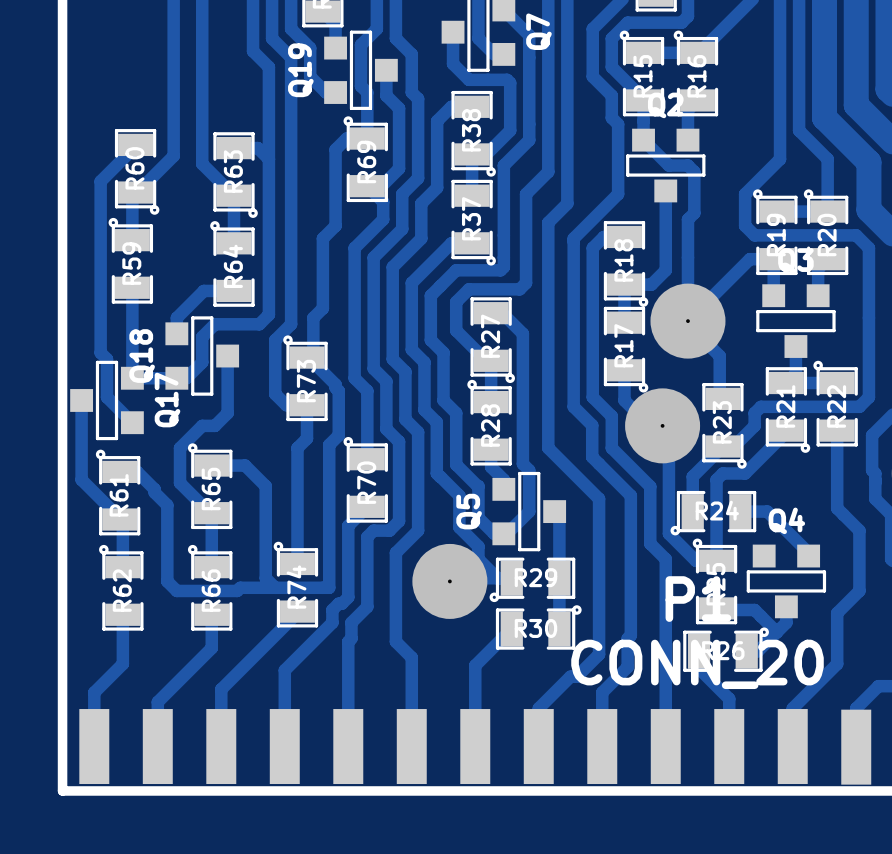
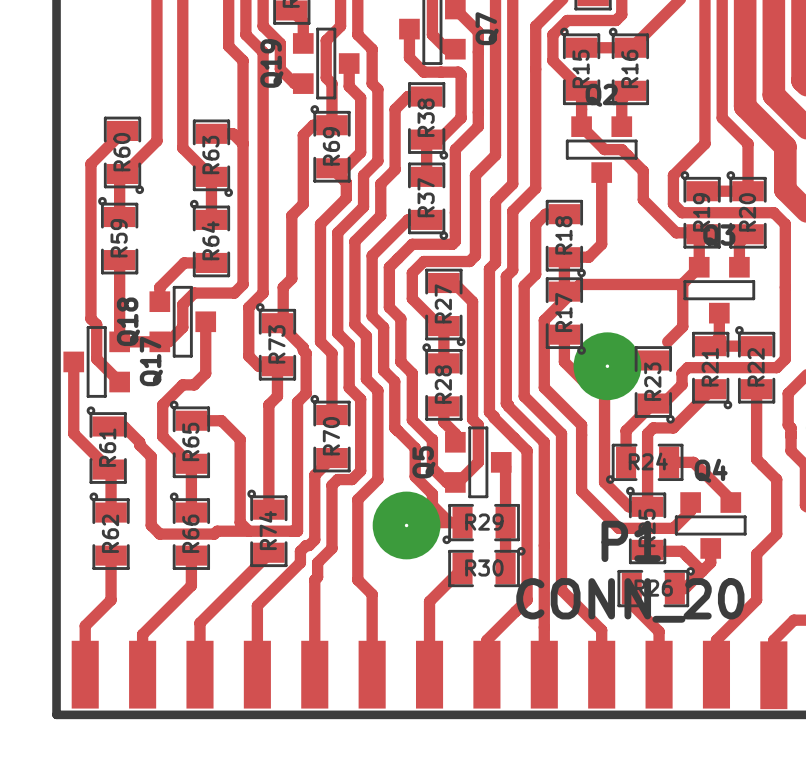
track: (592, 76) (611, 95) (611, 117) (618, 124) (618, 194) (573, 238) (573, 406) (592, 425) (592, 457) (630, 495) (630, 635) (627, 638) (627, 667) (602, 692) -> (535, 69) (535, 188) (512, 211) (512, 270) (506, 276) (506, 403) (544, 442) (544, 625)
track: (694, 171) (694, 213) (687, 219) (687, 324) (719, 356) (719, 395) (722, 398) -> none
track: (776, 259) (749, 259) (687, 321) -> (702, 234) (676, 232) (643, 199) (643, 171) (627, 155)
track: (548, 290) (548, 448) (599, 498) (599, 654) (576, 676) (570, 676) -> (494, 416) (527, 450) (527, 600) (515, 611)
track: none -> (495, 262) (489, 269) (489, 412) (493, 416)
track: none -> (699, 267) (682, 284) (580, 284) (544, 320) (544, 387) (581, 425) (581, 491) (618, 528) (673, 528) (690, 511) (690, 502)
track: (592, 303) (592, 397) (611, 416) (611, 448) (650, 486) (650, 543) (665, 559) (665, 697) -> (535, 274) (524, 285) (524, 396) (561, 433) (561, 590) (601, 630)
track: none -> (682, 283) (682, 326) (667, 341)
via: (687, 321) -> none
via position: (662, 425) -> (607, 366)

